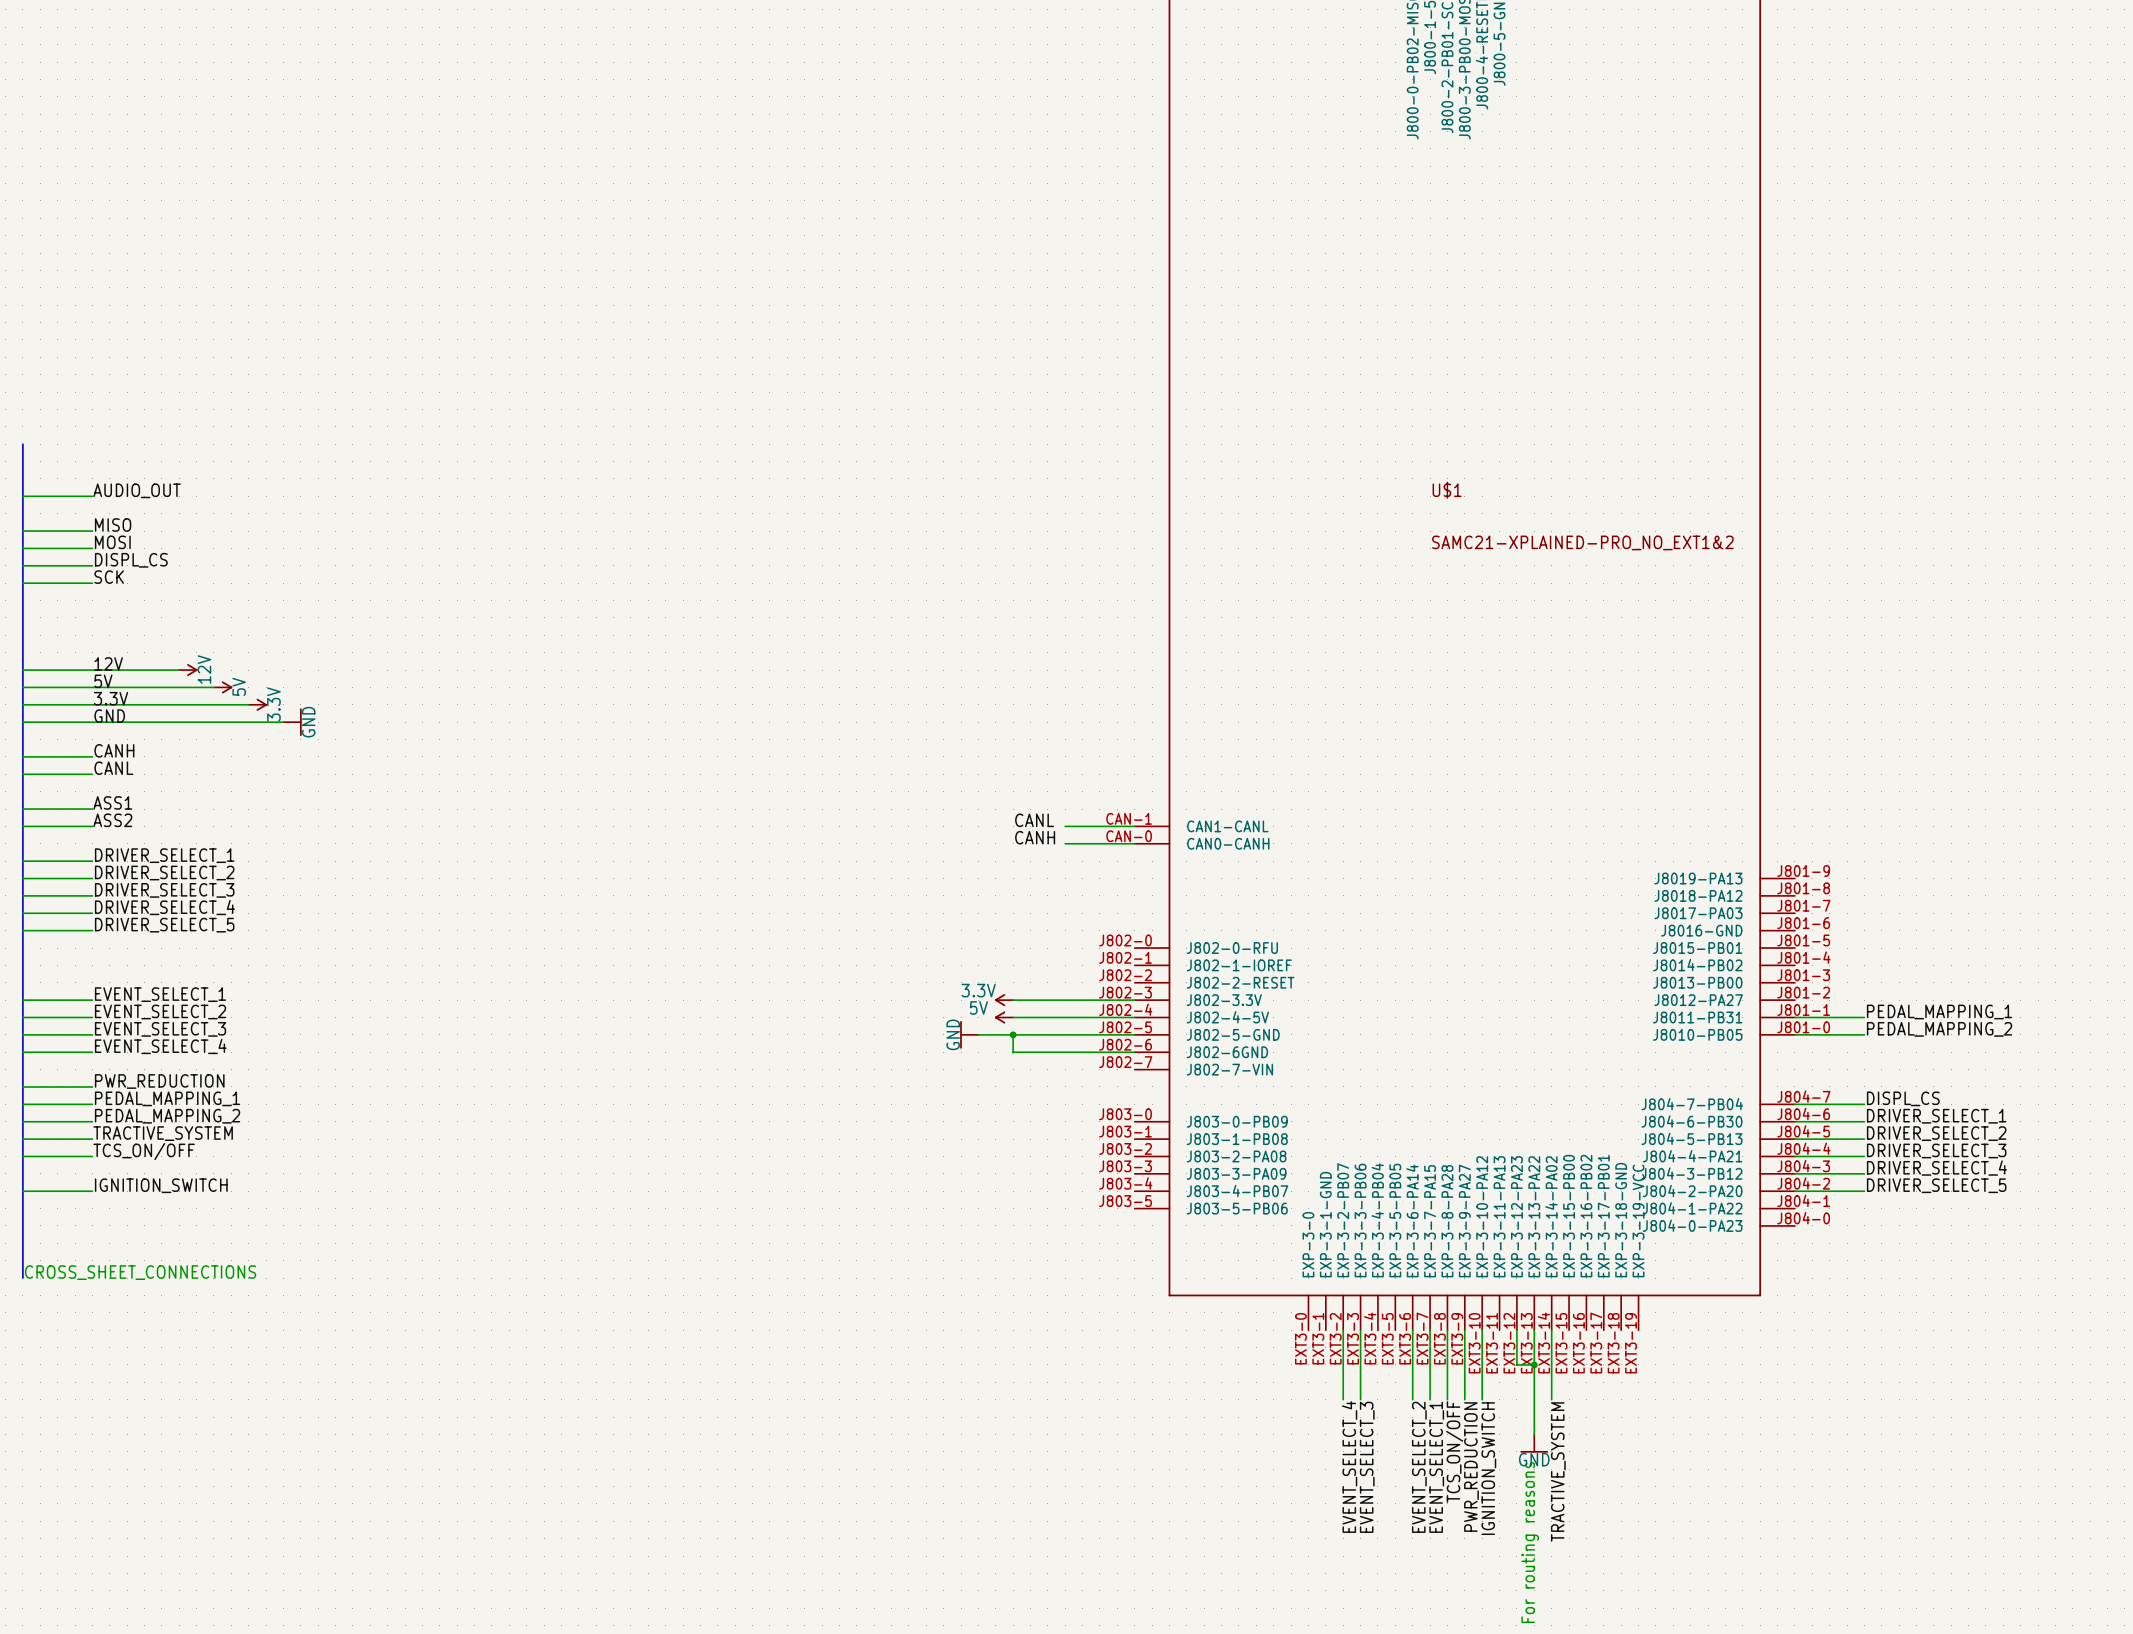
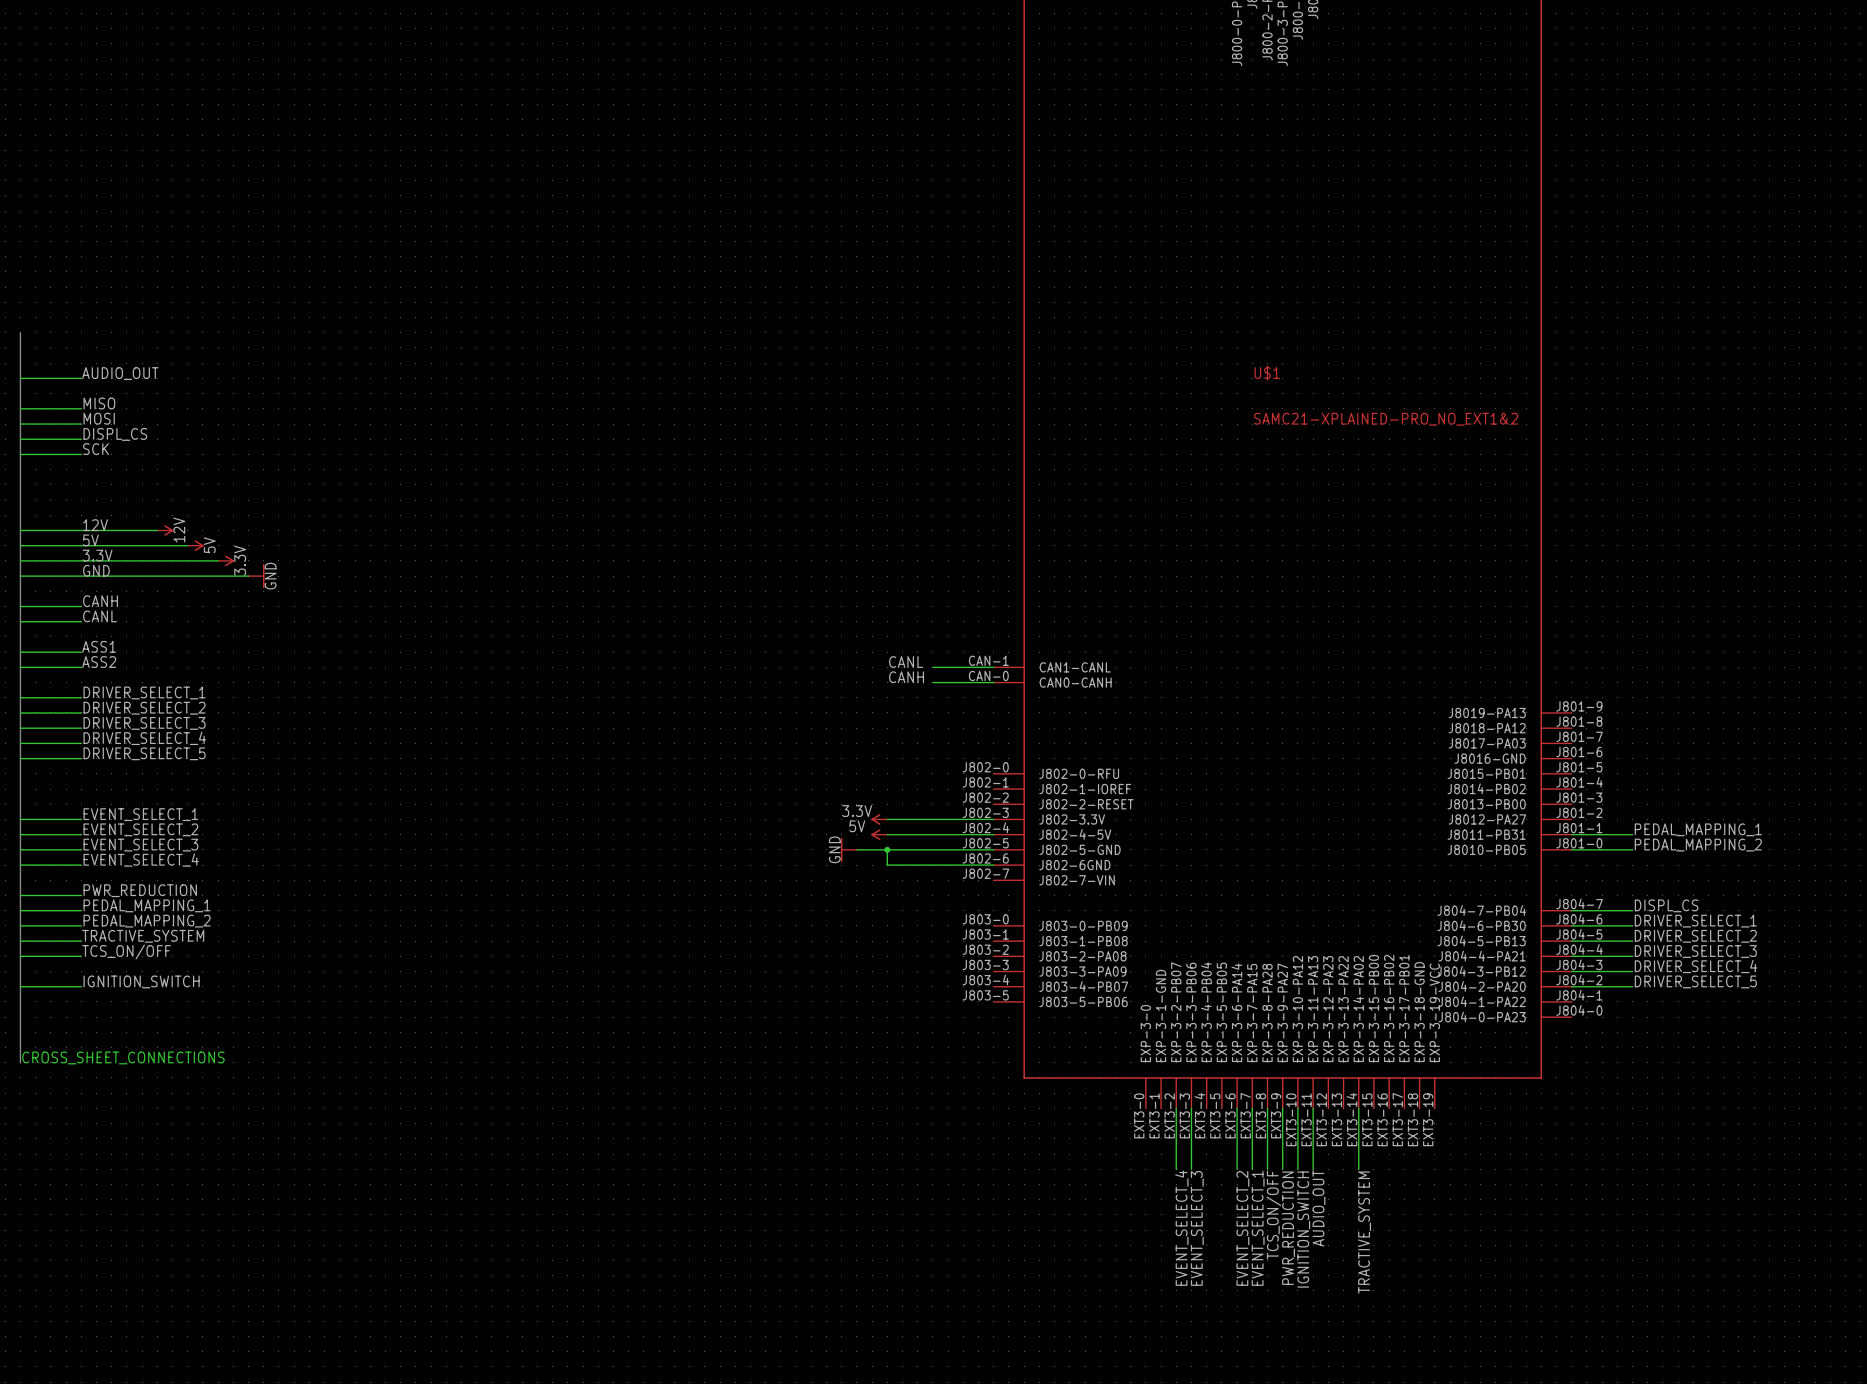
wire: none -> (1313, 1108) (1313, 1169)
wire: (1516, 1330) (1516, 1364) (1534, 1364) -> none
wire: (1534, 1330) (1534, 1434) -> none
junction: (1534, 1364) -> none
power symbol: GND (1534, 1443) -> none
label: none -> AUDIO_OUT (1318, 1208)
text: For routing reasons (1530, 1542) -> none

